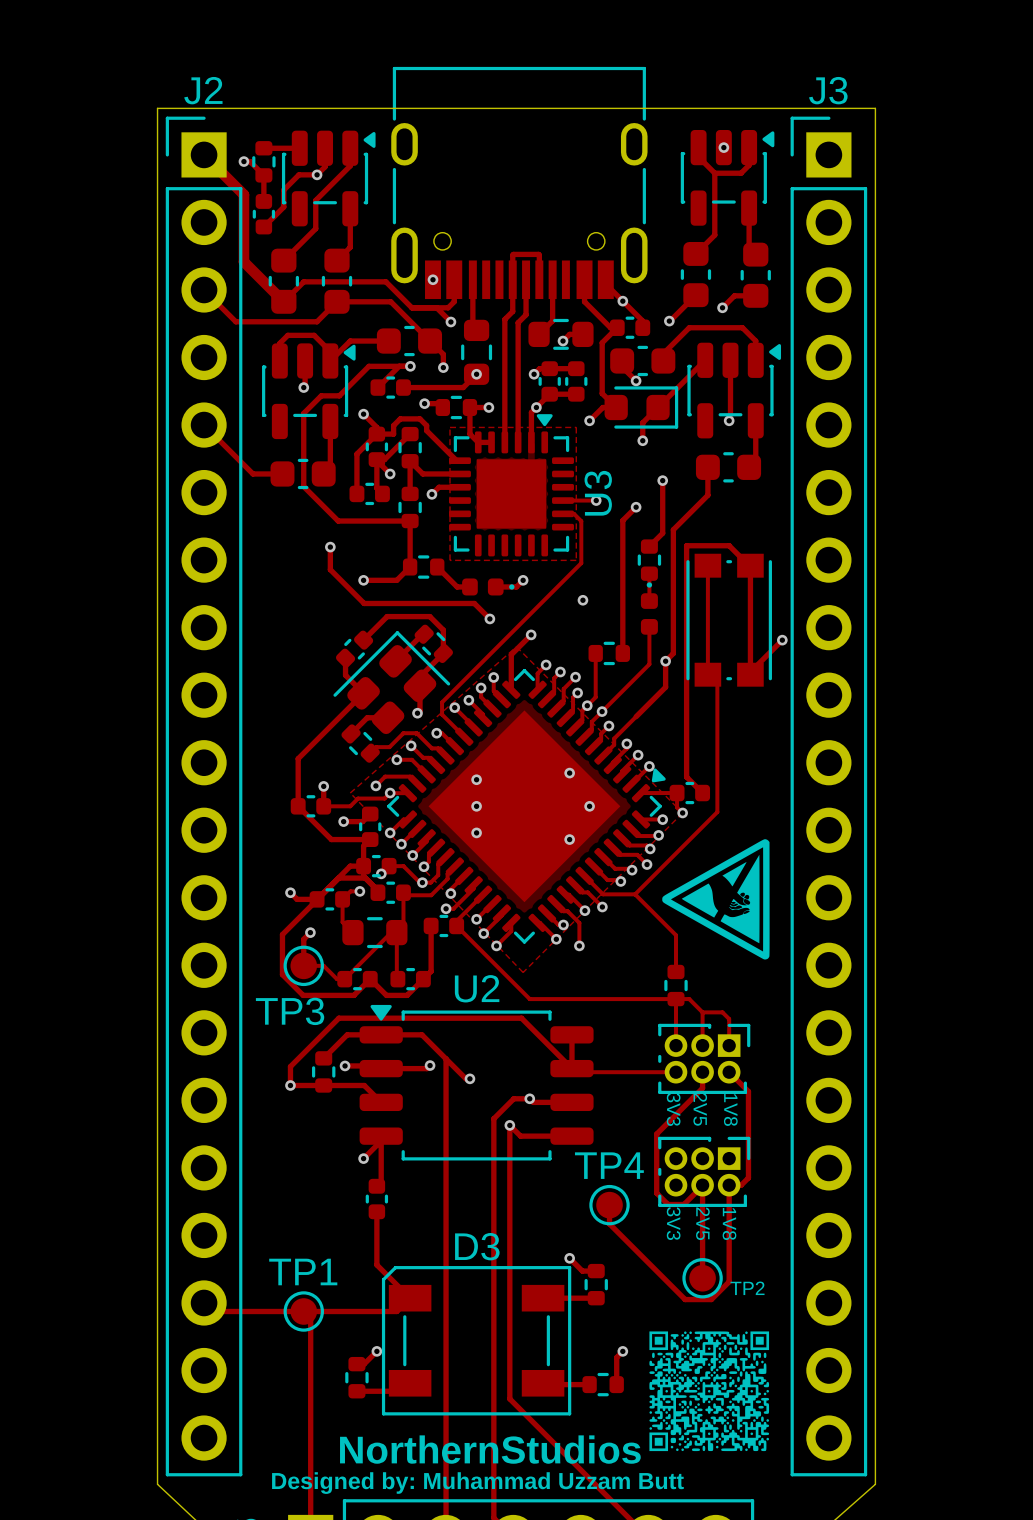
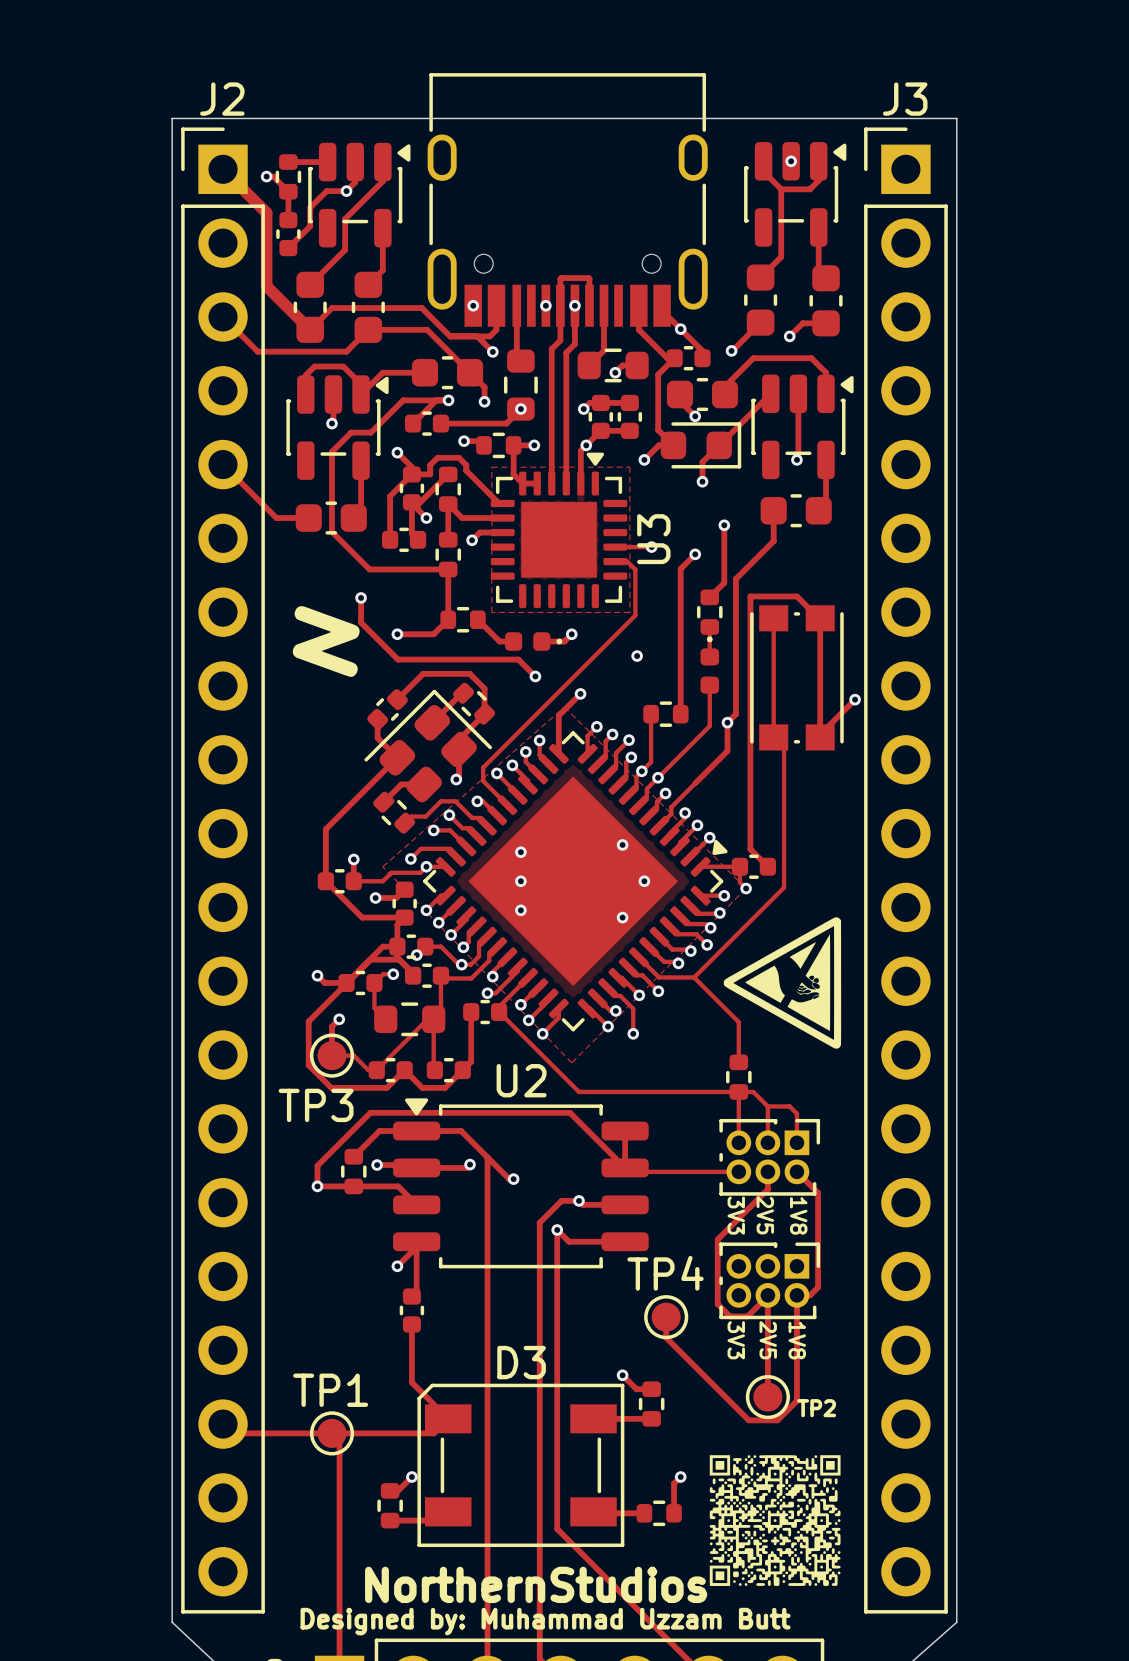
via: none -> (545, 305)
via: none -> (574, 305)
drawing: none -> [292, 606, 360, 677]

